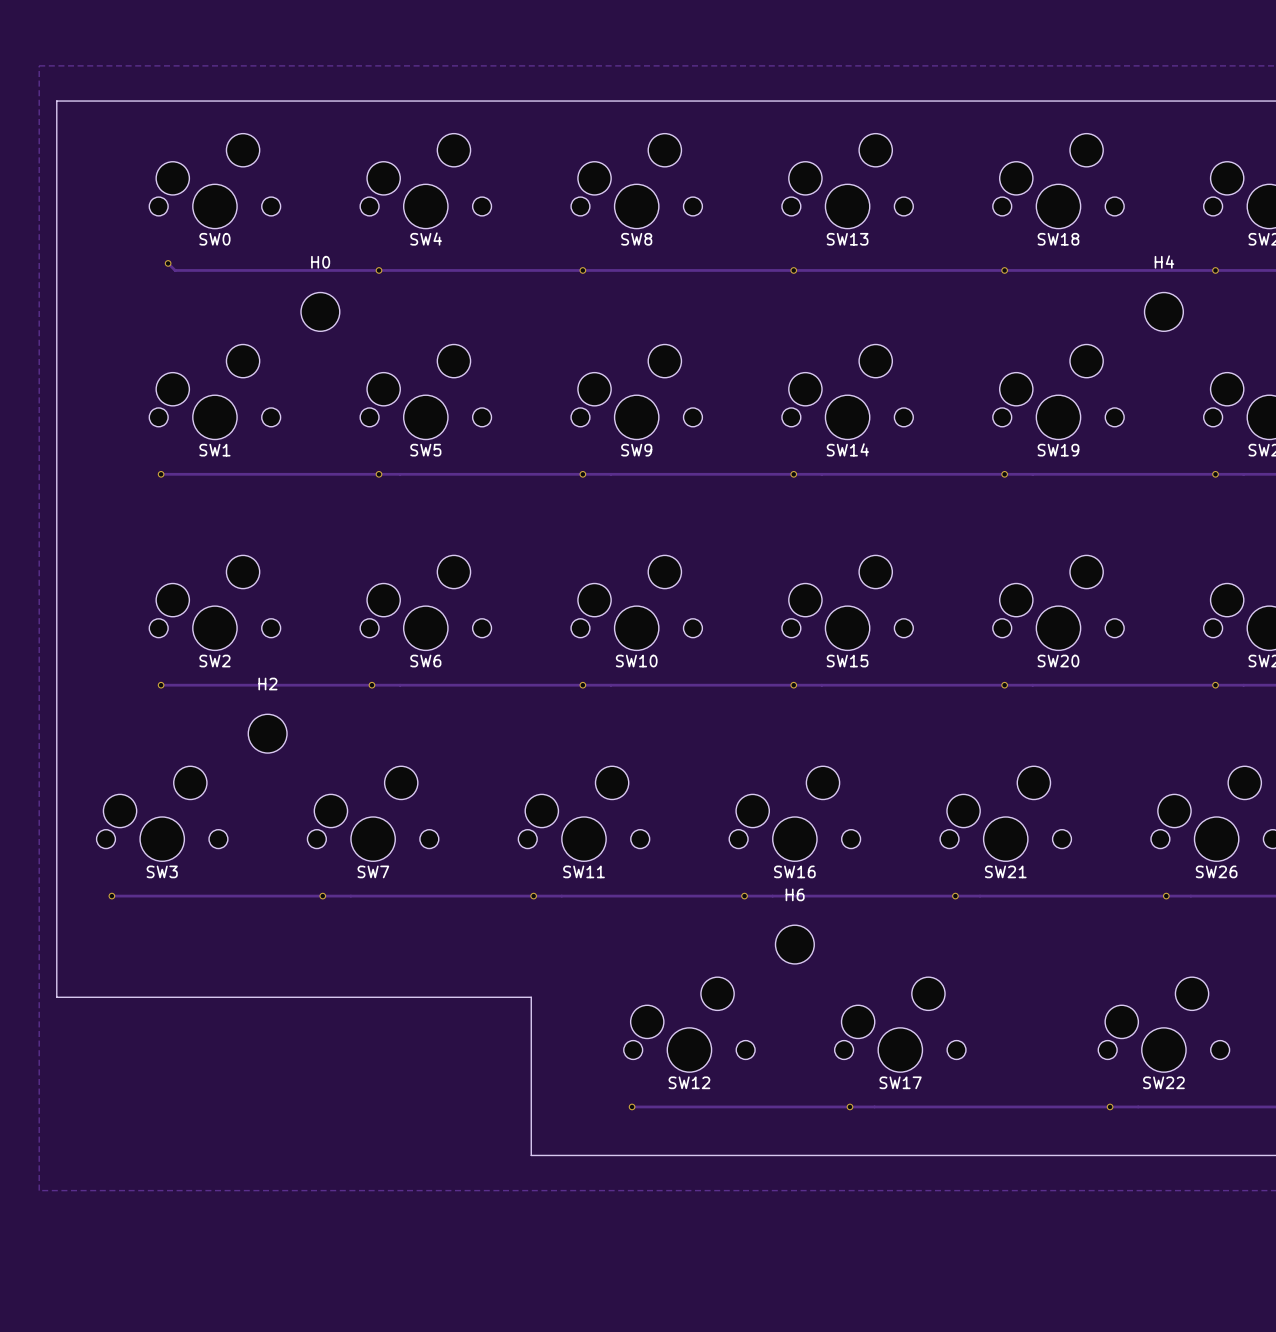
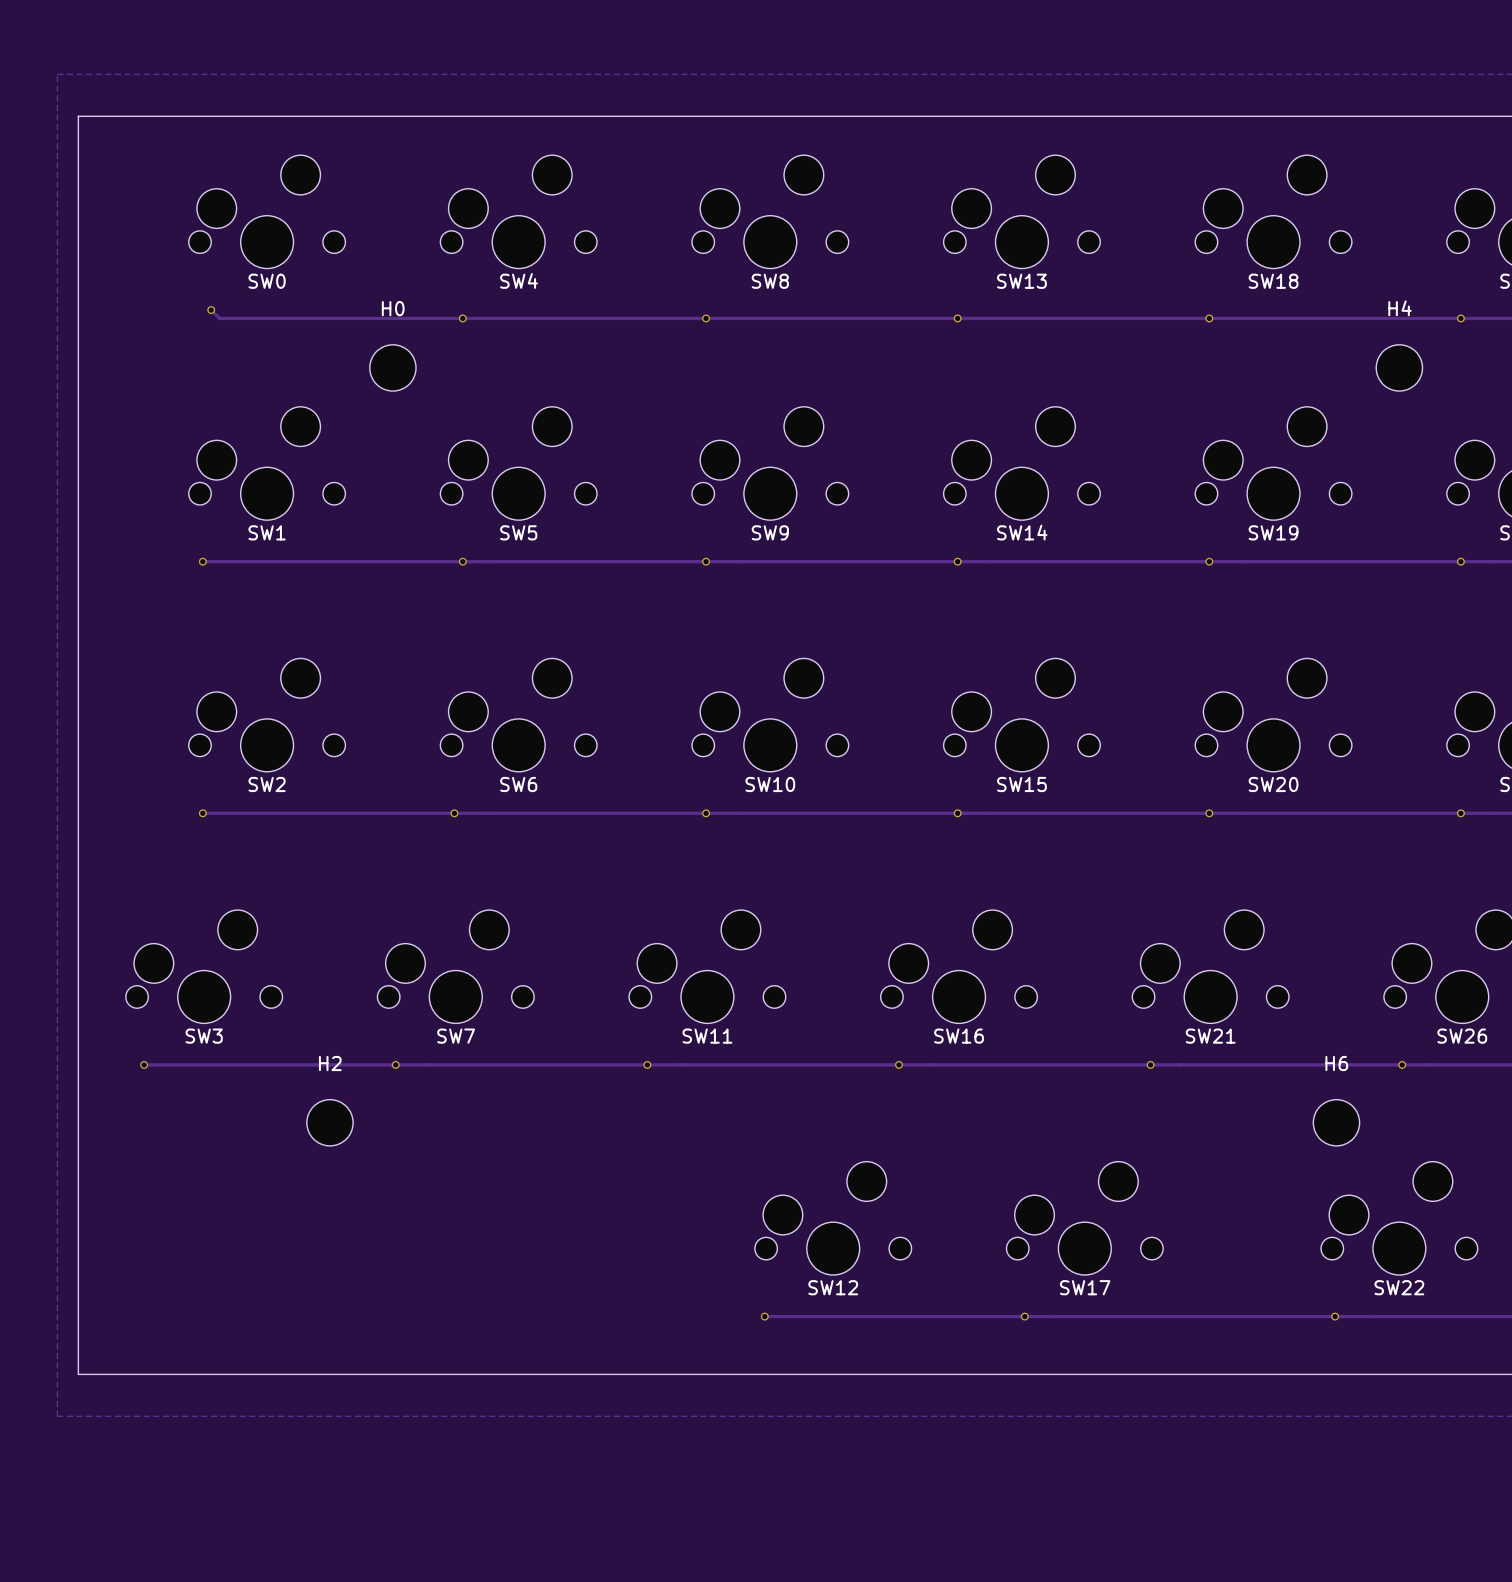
H2 position: (267, 733) -> (329, 1122)
H6 position: (794, 944) -> (1336, 1122)
board edge: (56, 997) (531, 997) (531, 1155) -> (78, 1185) (78, 1374) (644, 1374)

